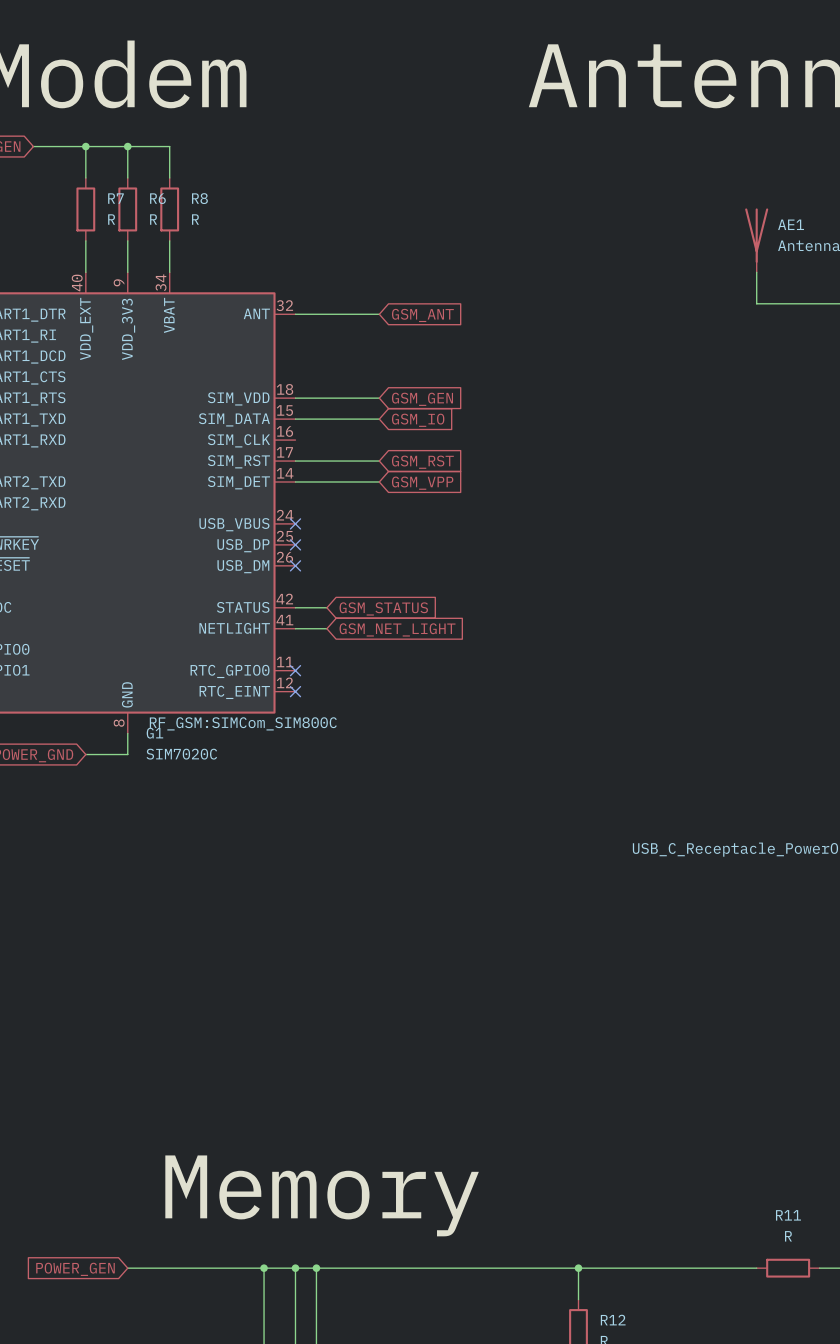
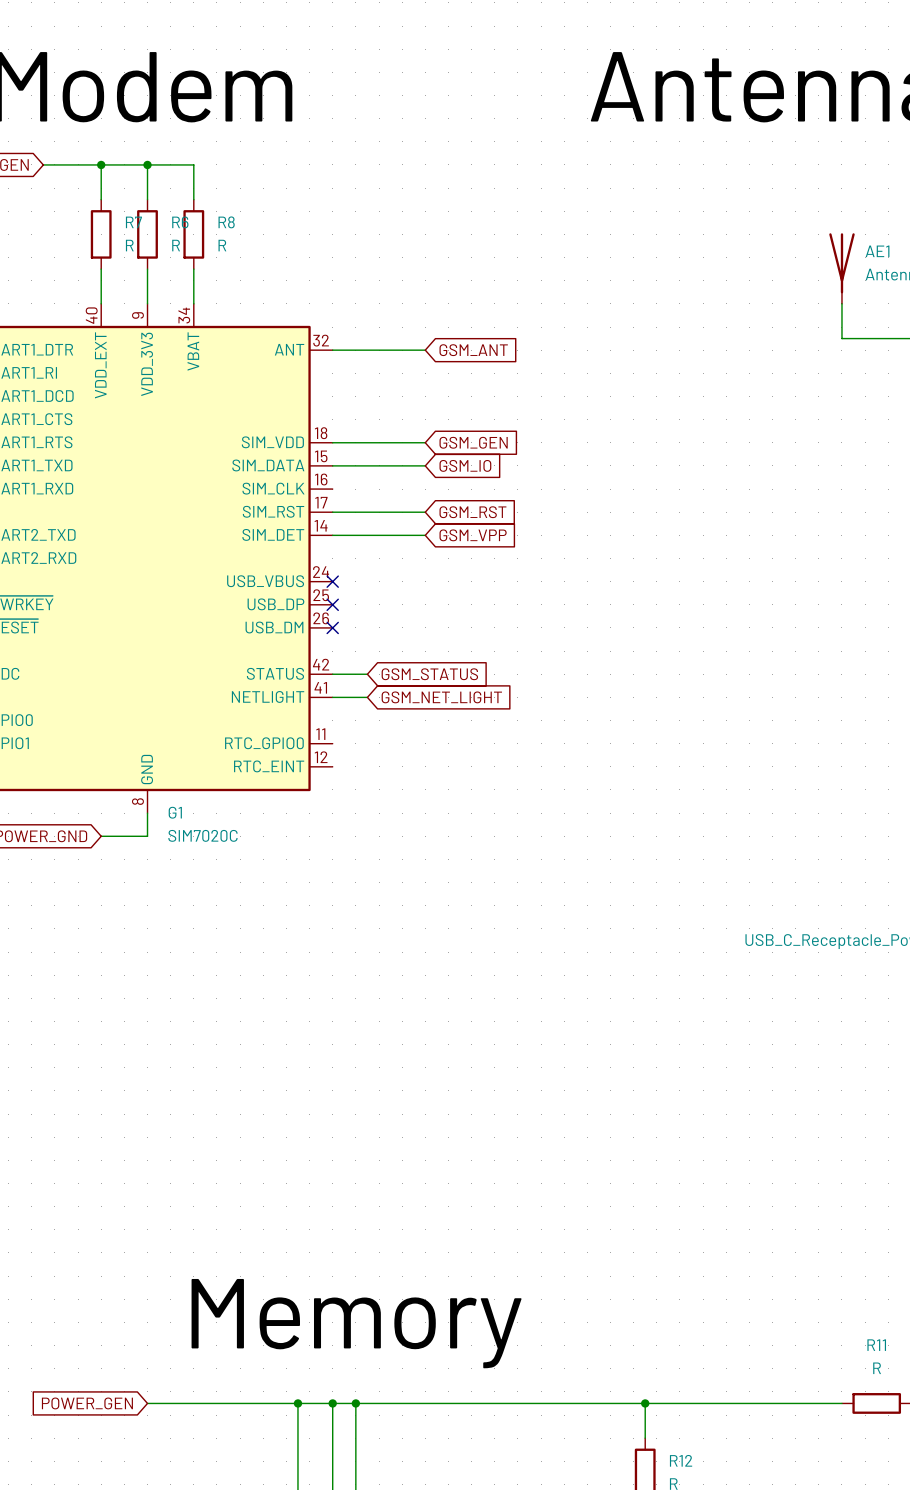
no-connect mark: (295, 670) -> none
no-connect mark: (295, 691) -> none
G1 text: RF_GSM:SIMCom_SIM800C (243, 723) -> none

